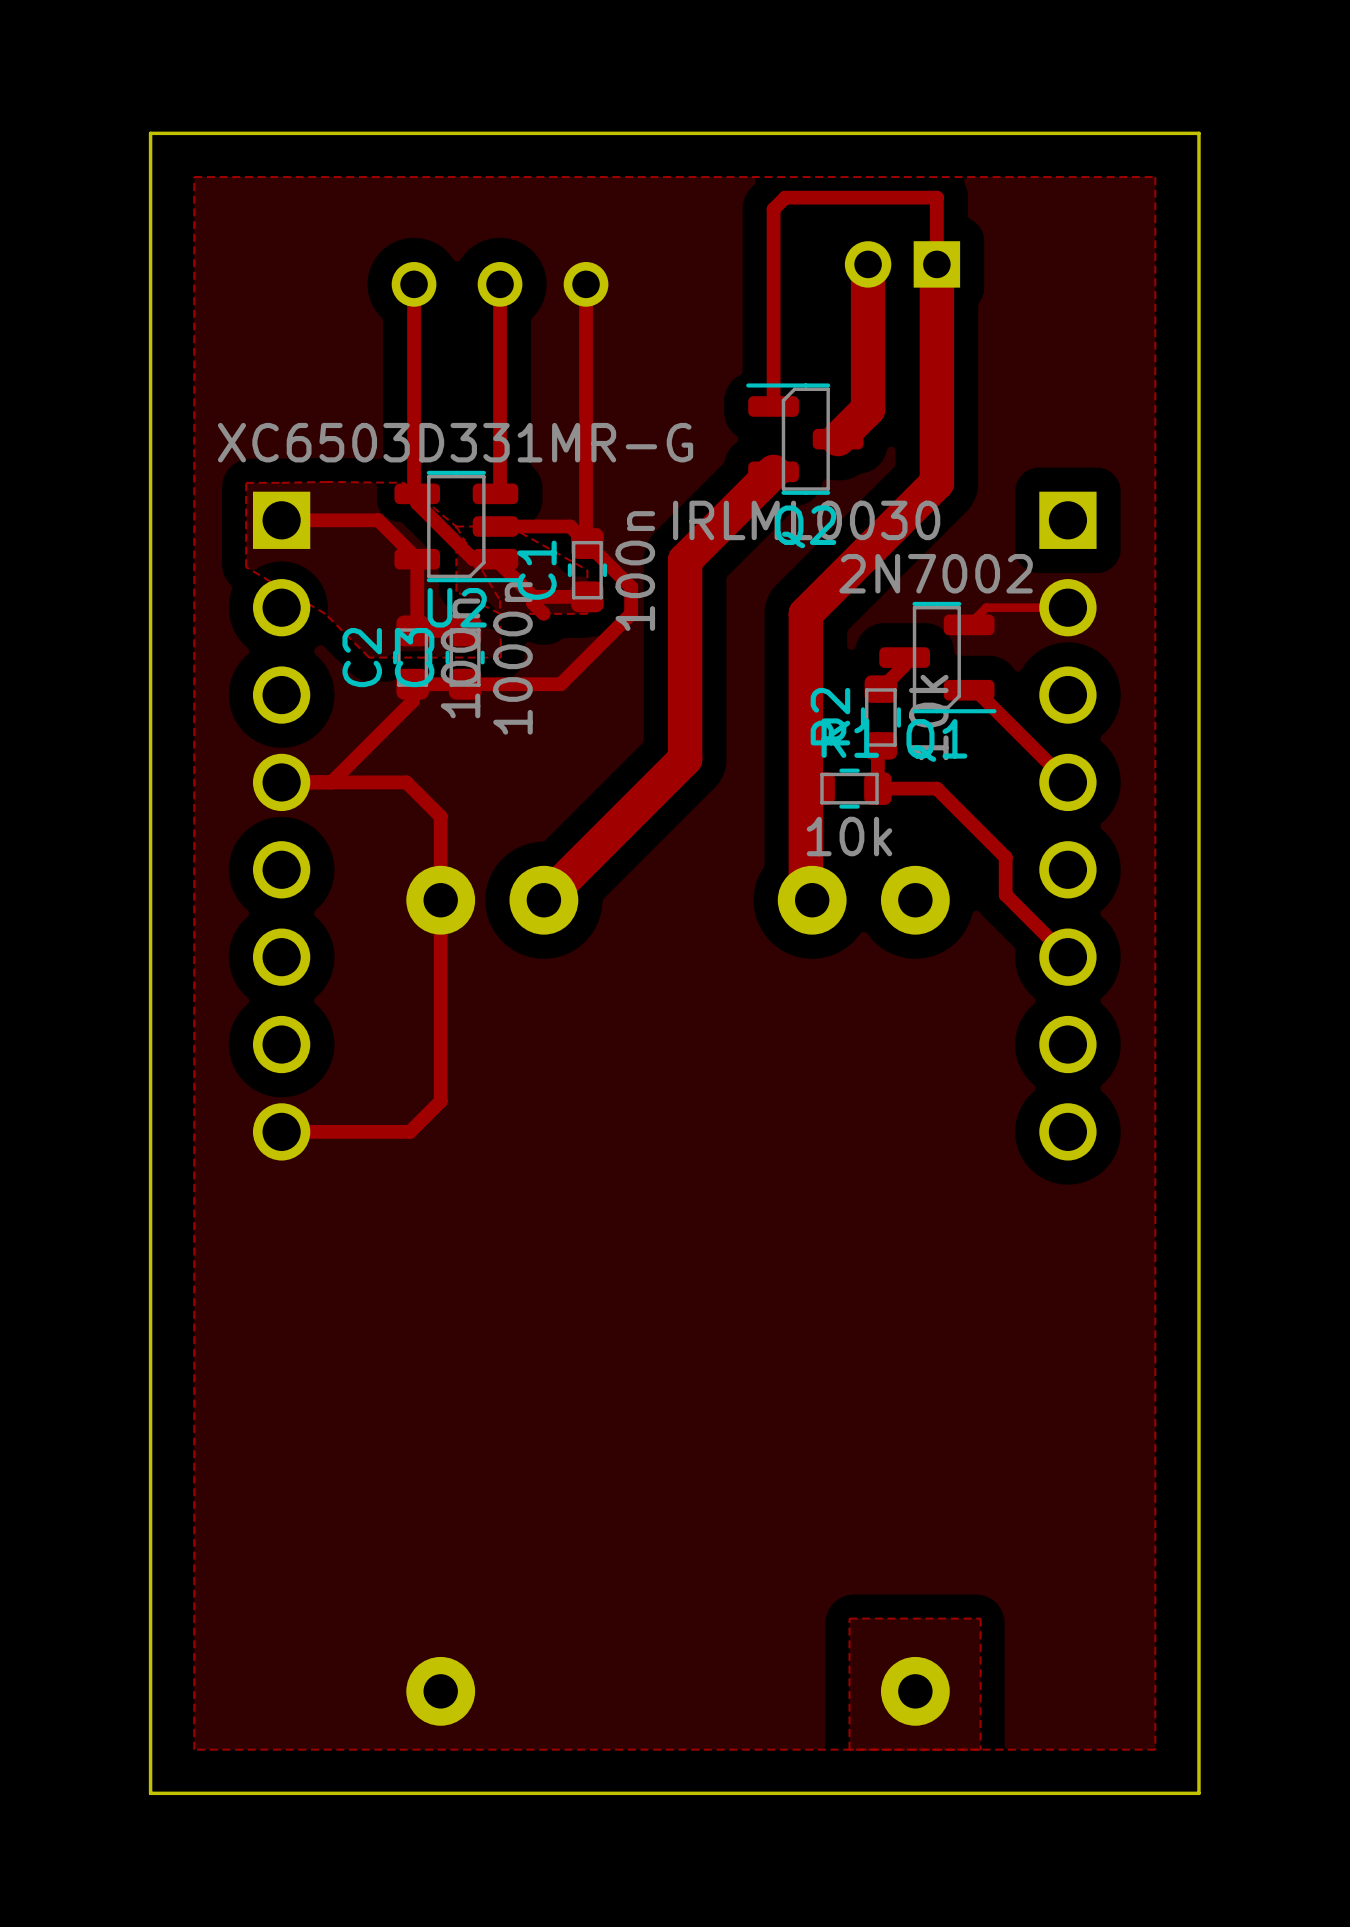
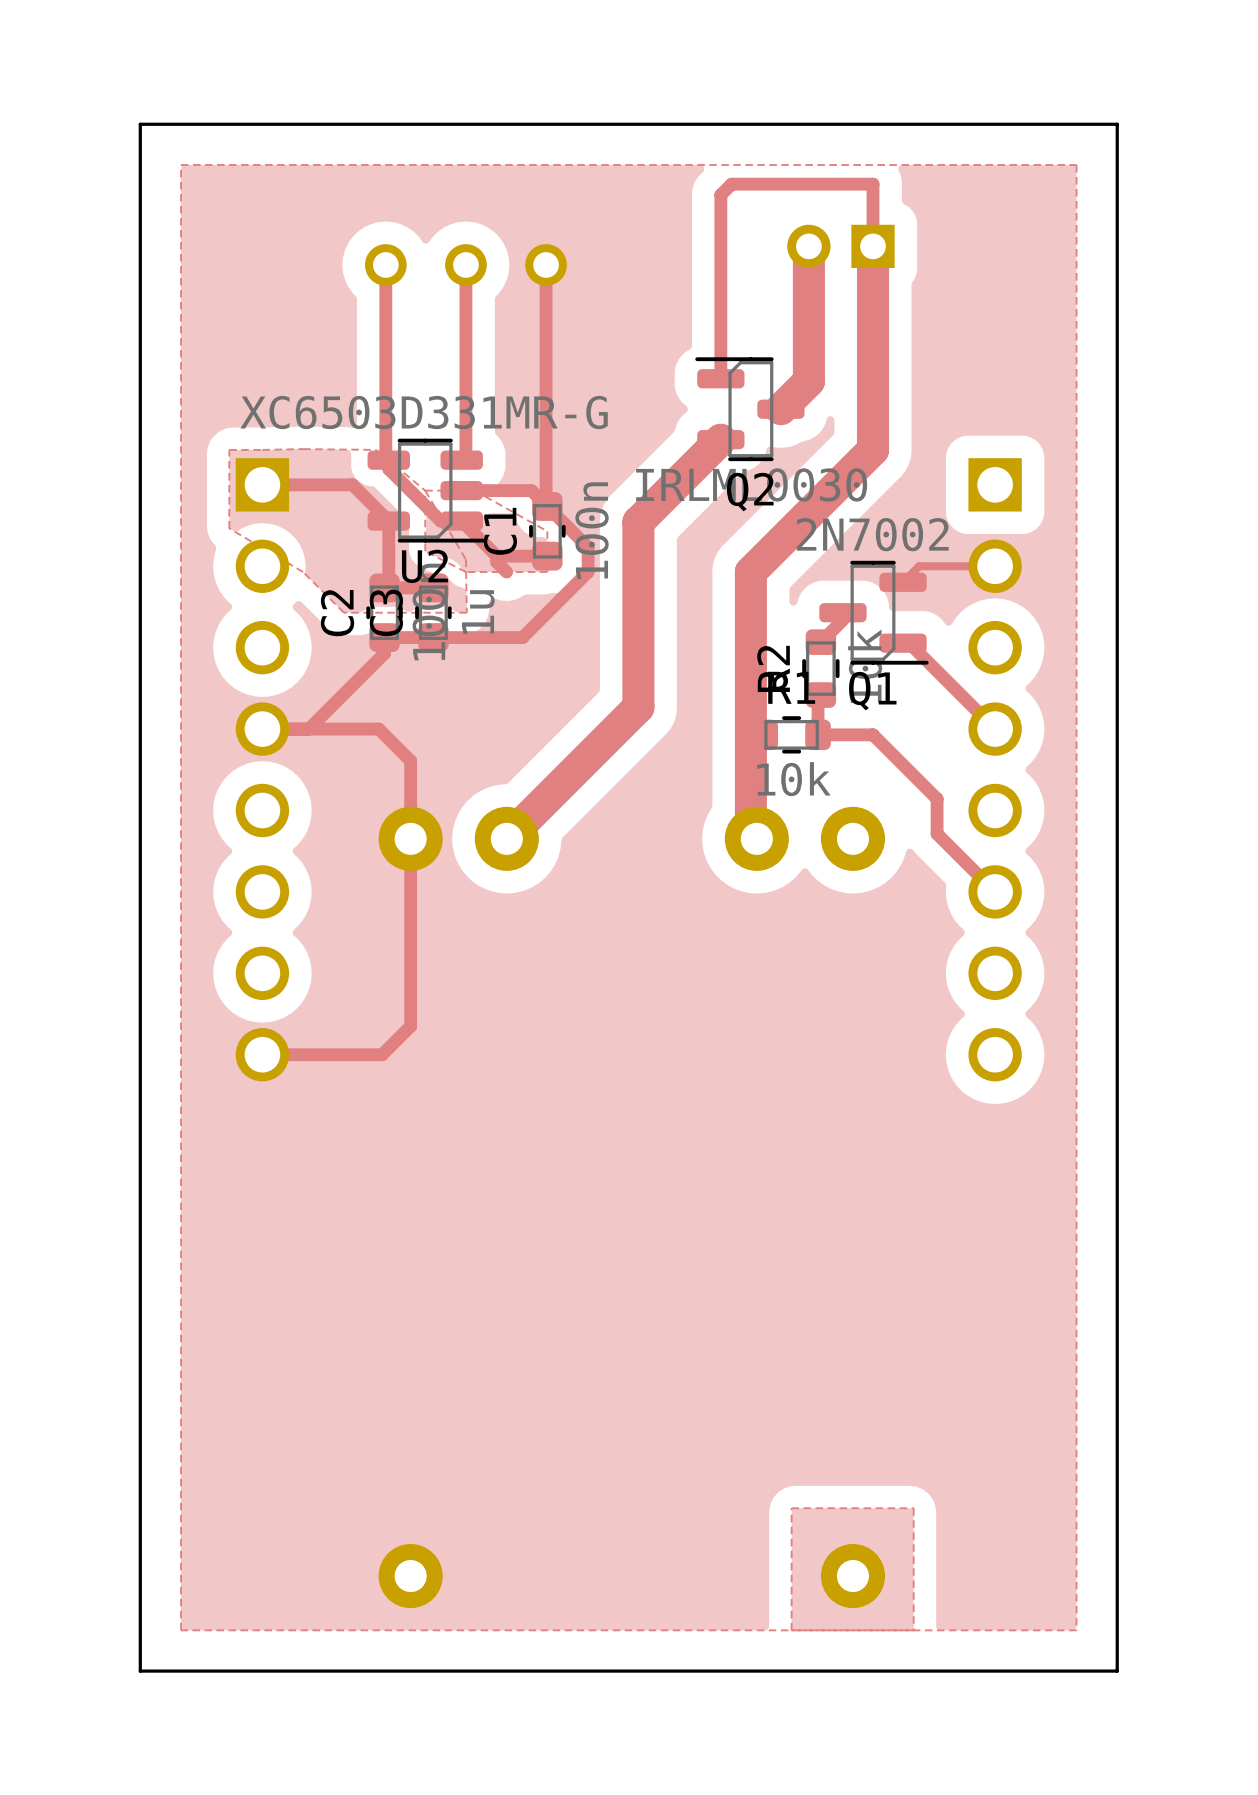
C3 value: 1000n (512, 658) -> 1u (478, 612)

